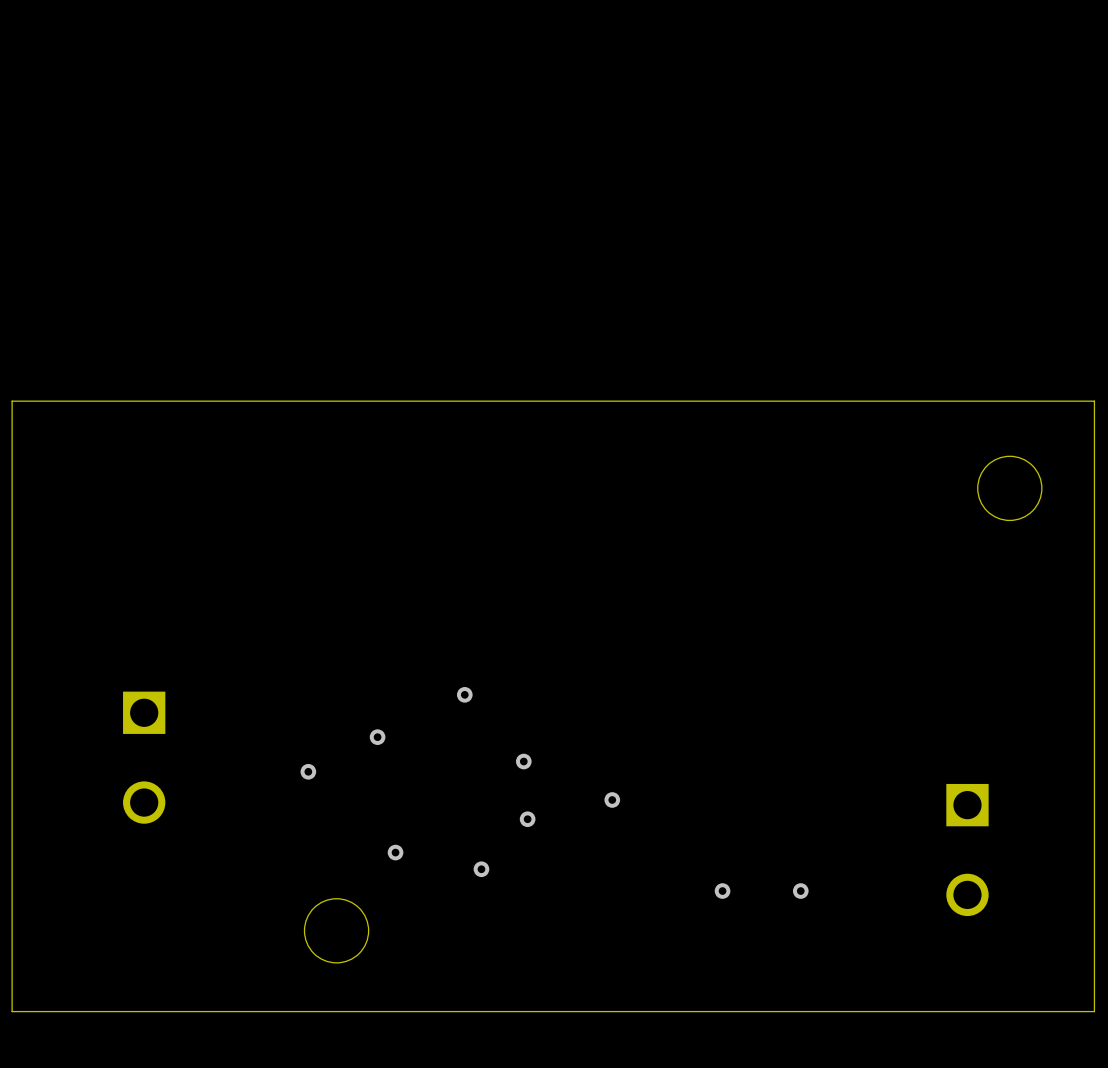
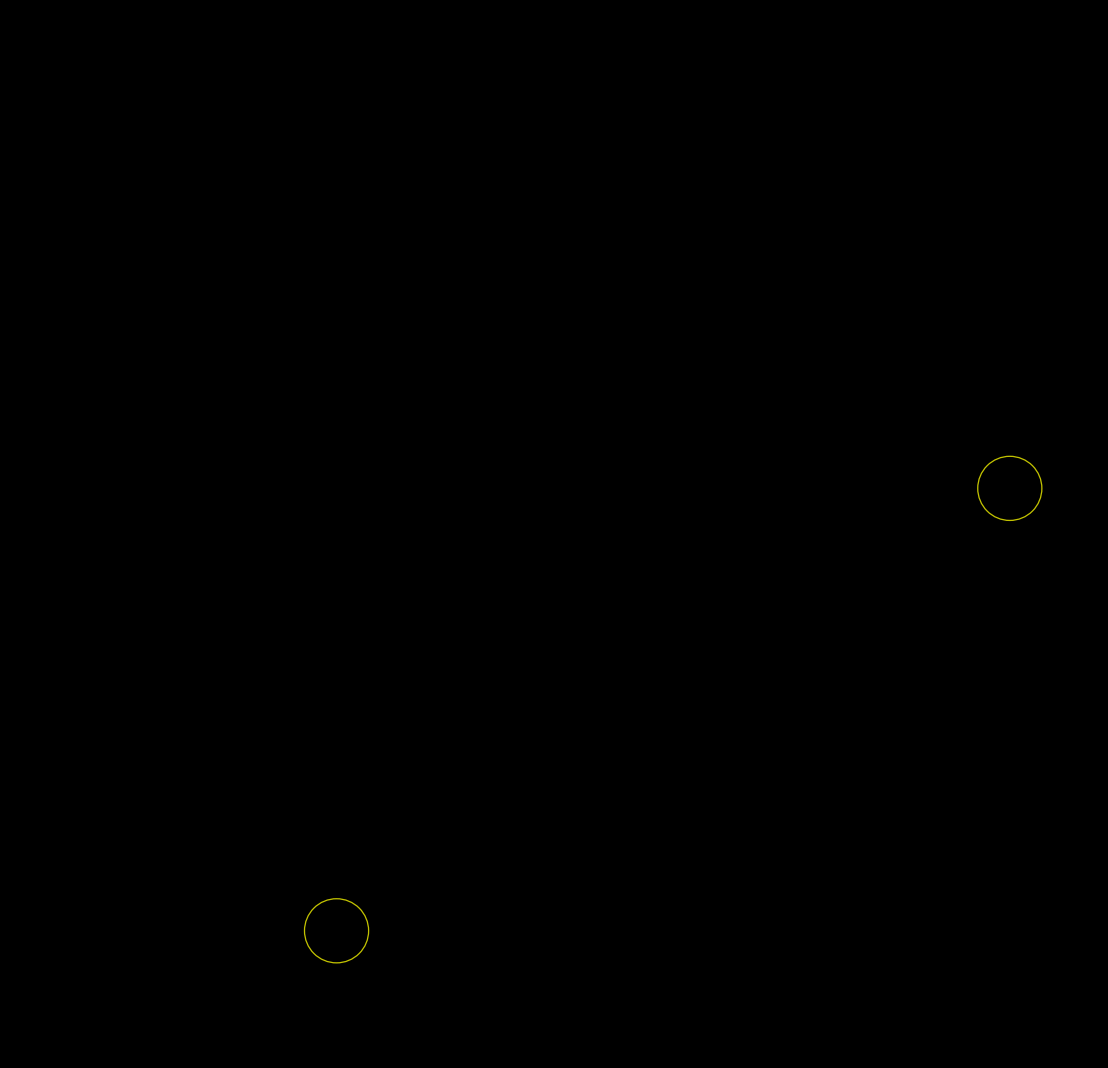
board edge: (1094, 401) (12, 401) (12, 1011) (1094, 1011) (1094, 401) -> none
via: (464, 694) -> none
via: (377, 737) -> none
part: (144, 757) -> none
via: (523, 761) -> none
via: (308, 771) -> none
via: (612, 799) -> none
via: (527, 819) -> none
part: (967, 850) -> none
via: (395, 852) -> none
via: (481, 869) -> none
via: (722, 891) -> none
via: (800, 891) -> none

